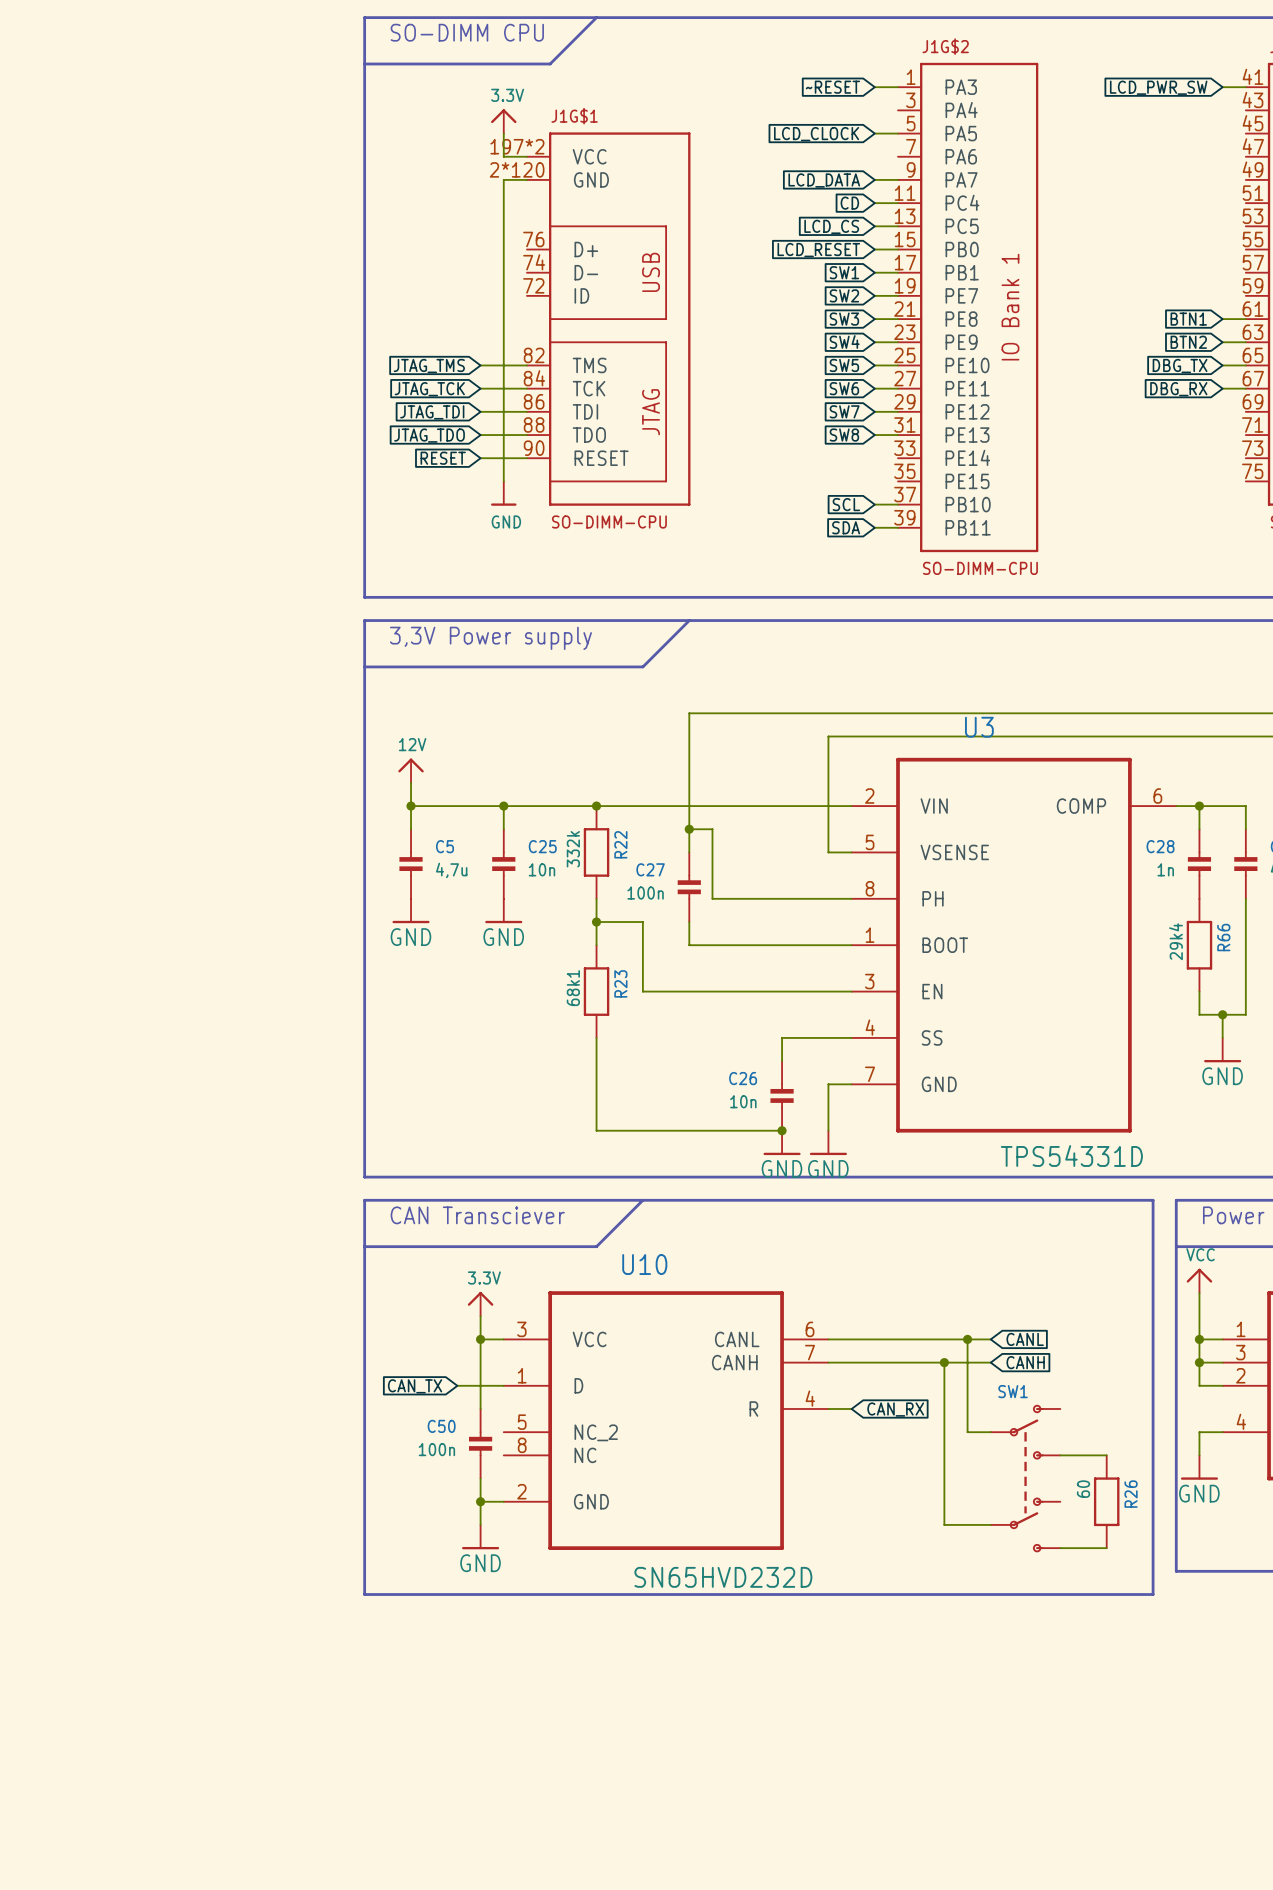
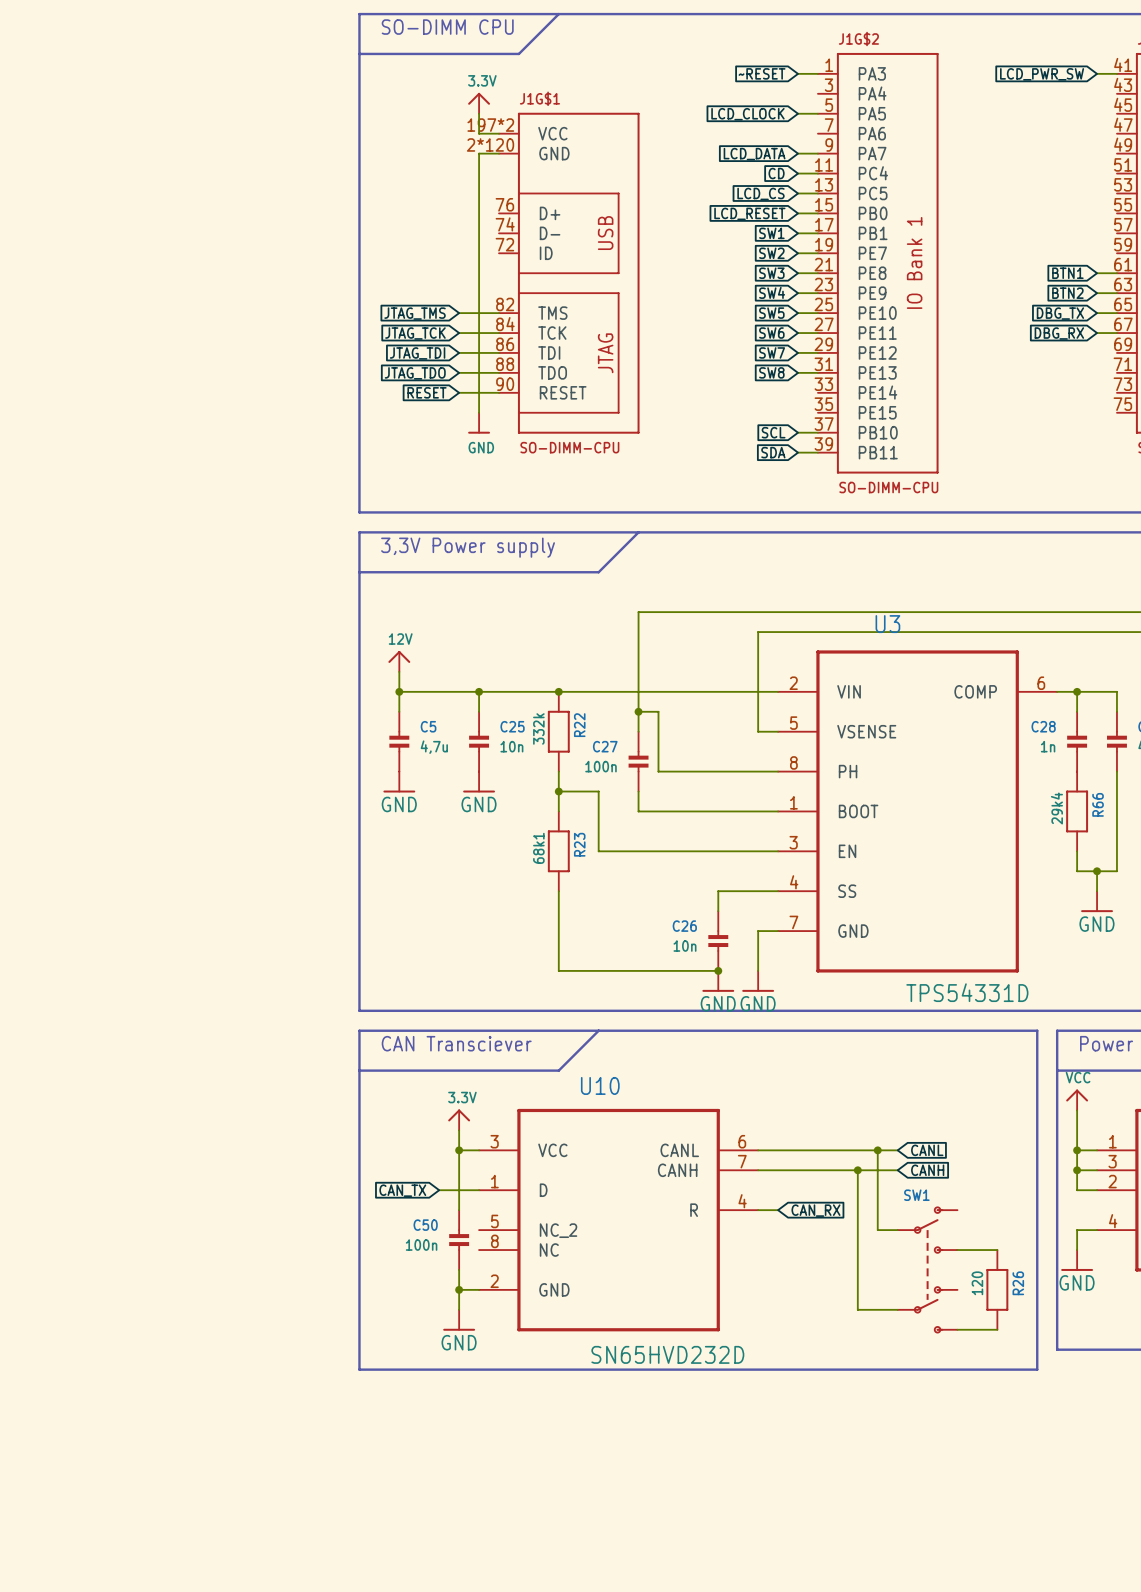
R26 value: 60 (1083, 1489) -> 120 (977, 1283)

